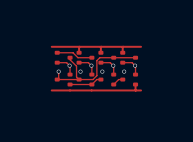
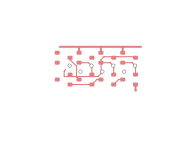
top track: (59, 46) (51, 46) -> none
top track: (57, 52) (72, 52) (77, 57) (91, 57) -> none
top track: none -> (136, 56) (104, 56) (101, 59) (101, 73) (97, 76) (64, 76) (65, 69)
top track: (135, 57) (99, 57) (96, 60) (96, 75) (92, 79) (57, 79) (58, 71) -> none
top track: (57, 62) (66, 62) (70, 66) (70, 74) -> none
via: (58, 71) -> none
top track: (141, 90) (51, 90) -> none

